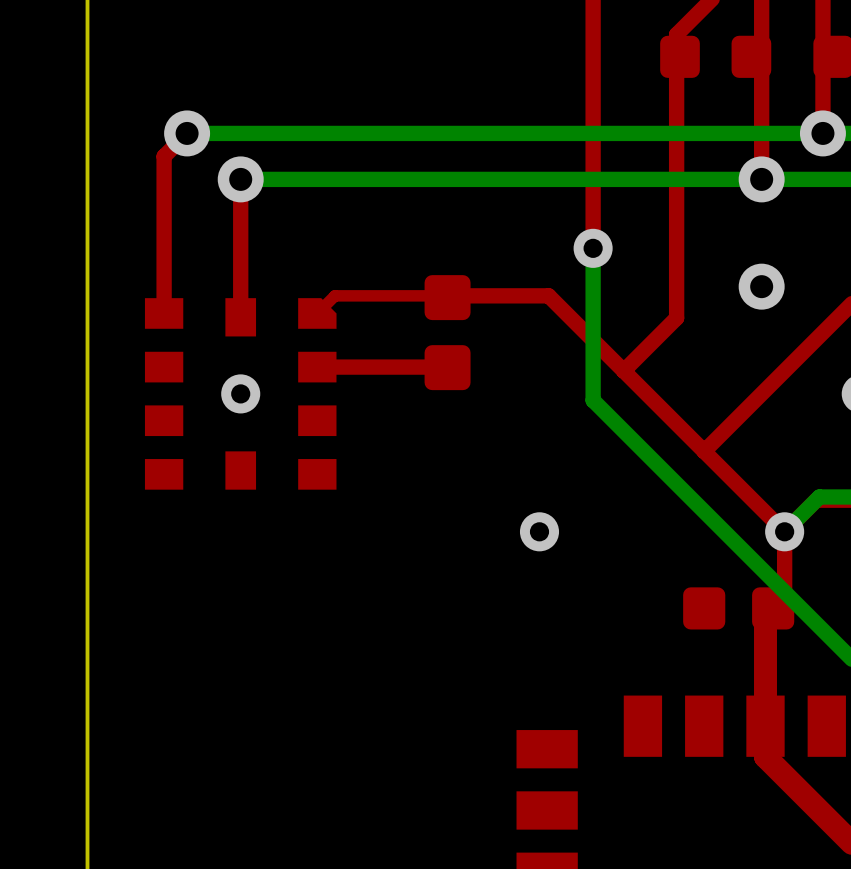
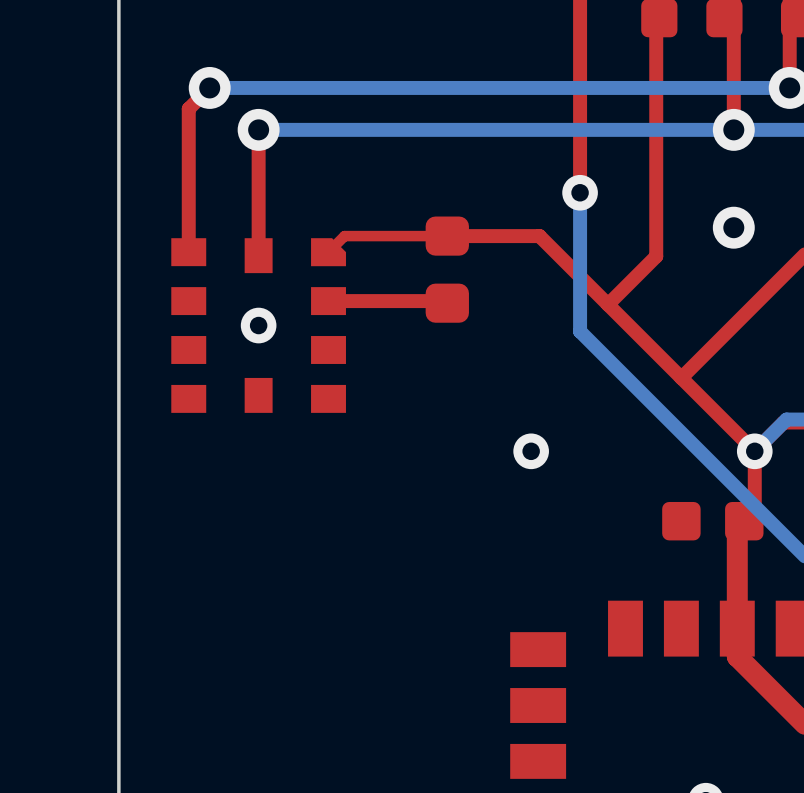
part footprint: [424, 275, 471, 391] -> [425, 216, 469, 323]

